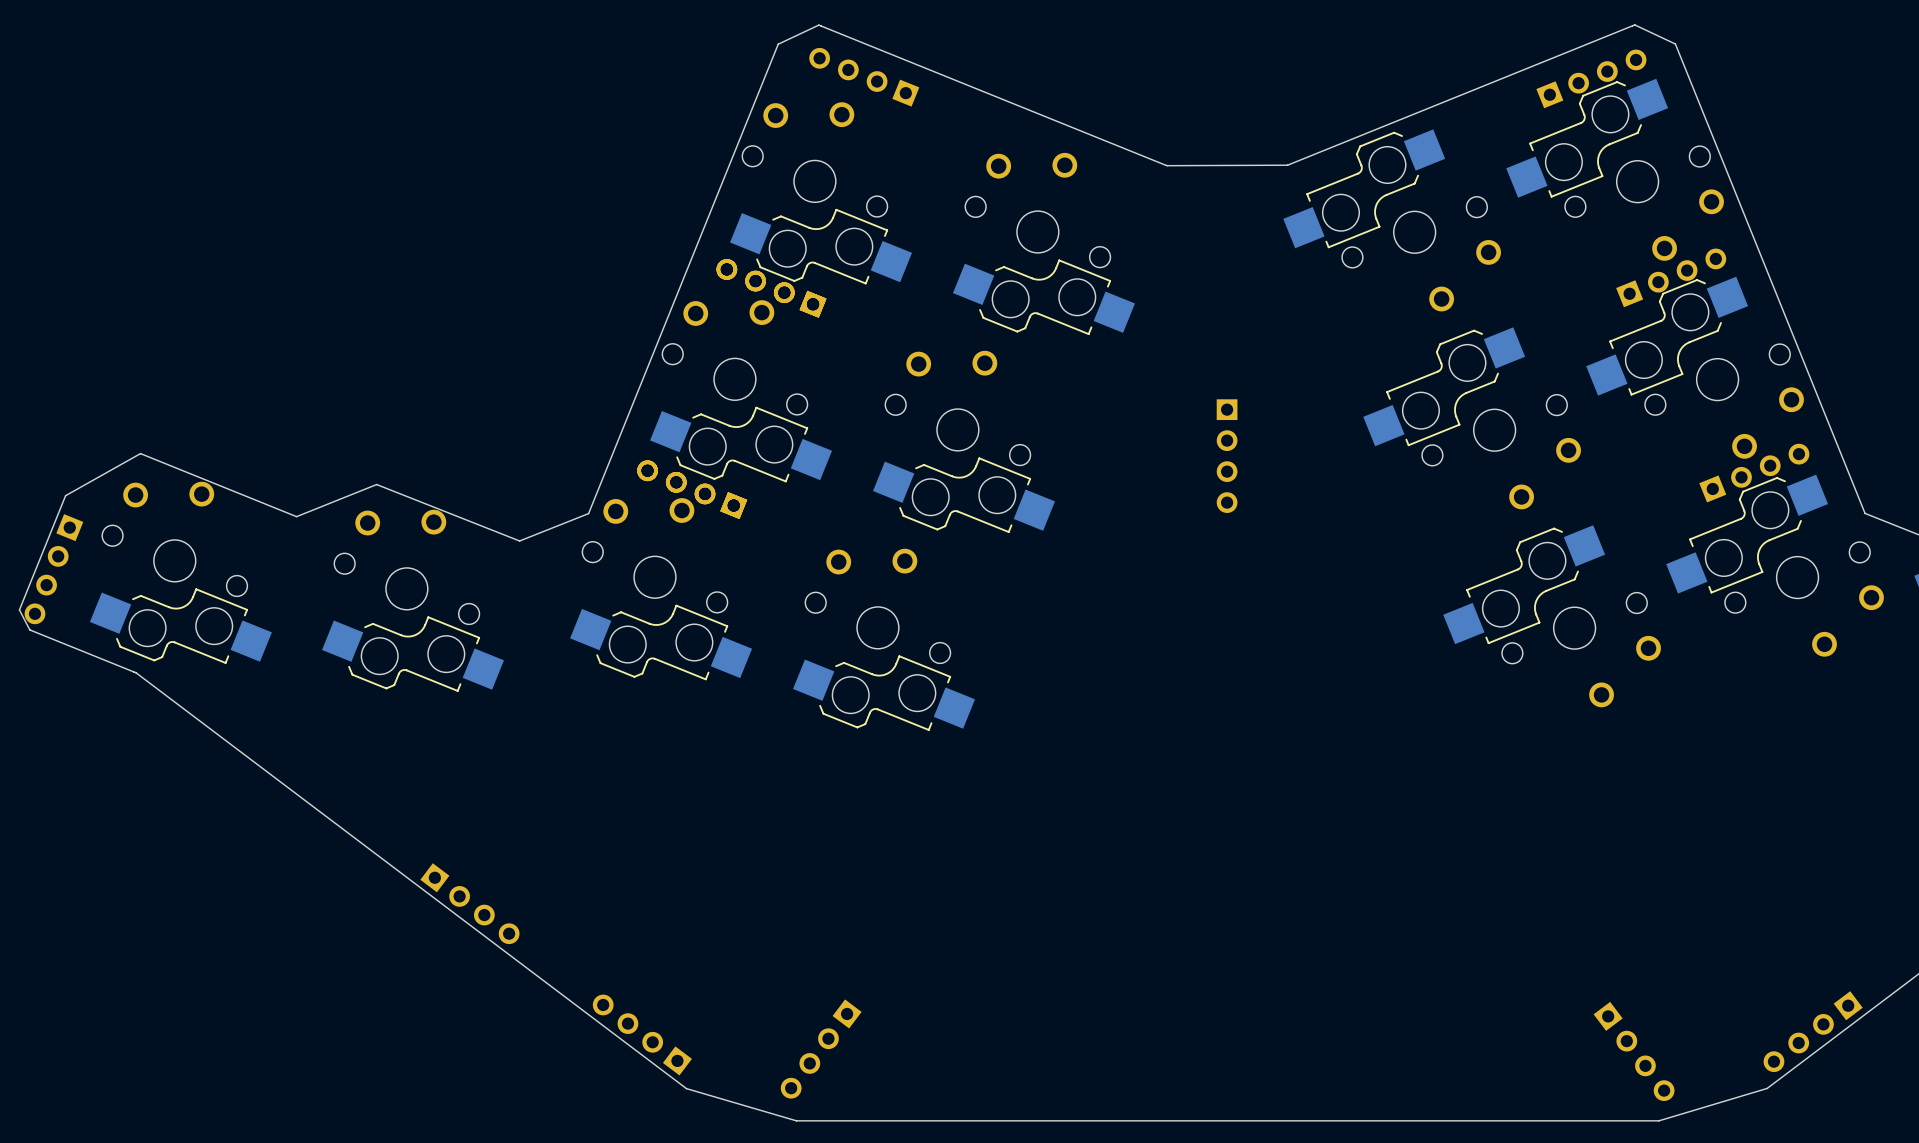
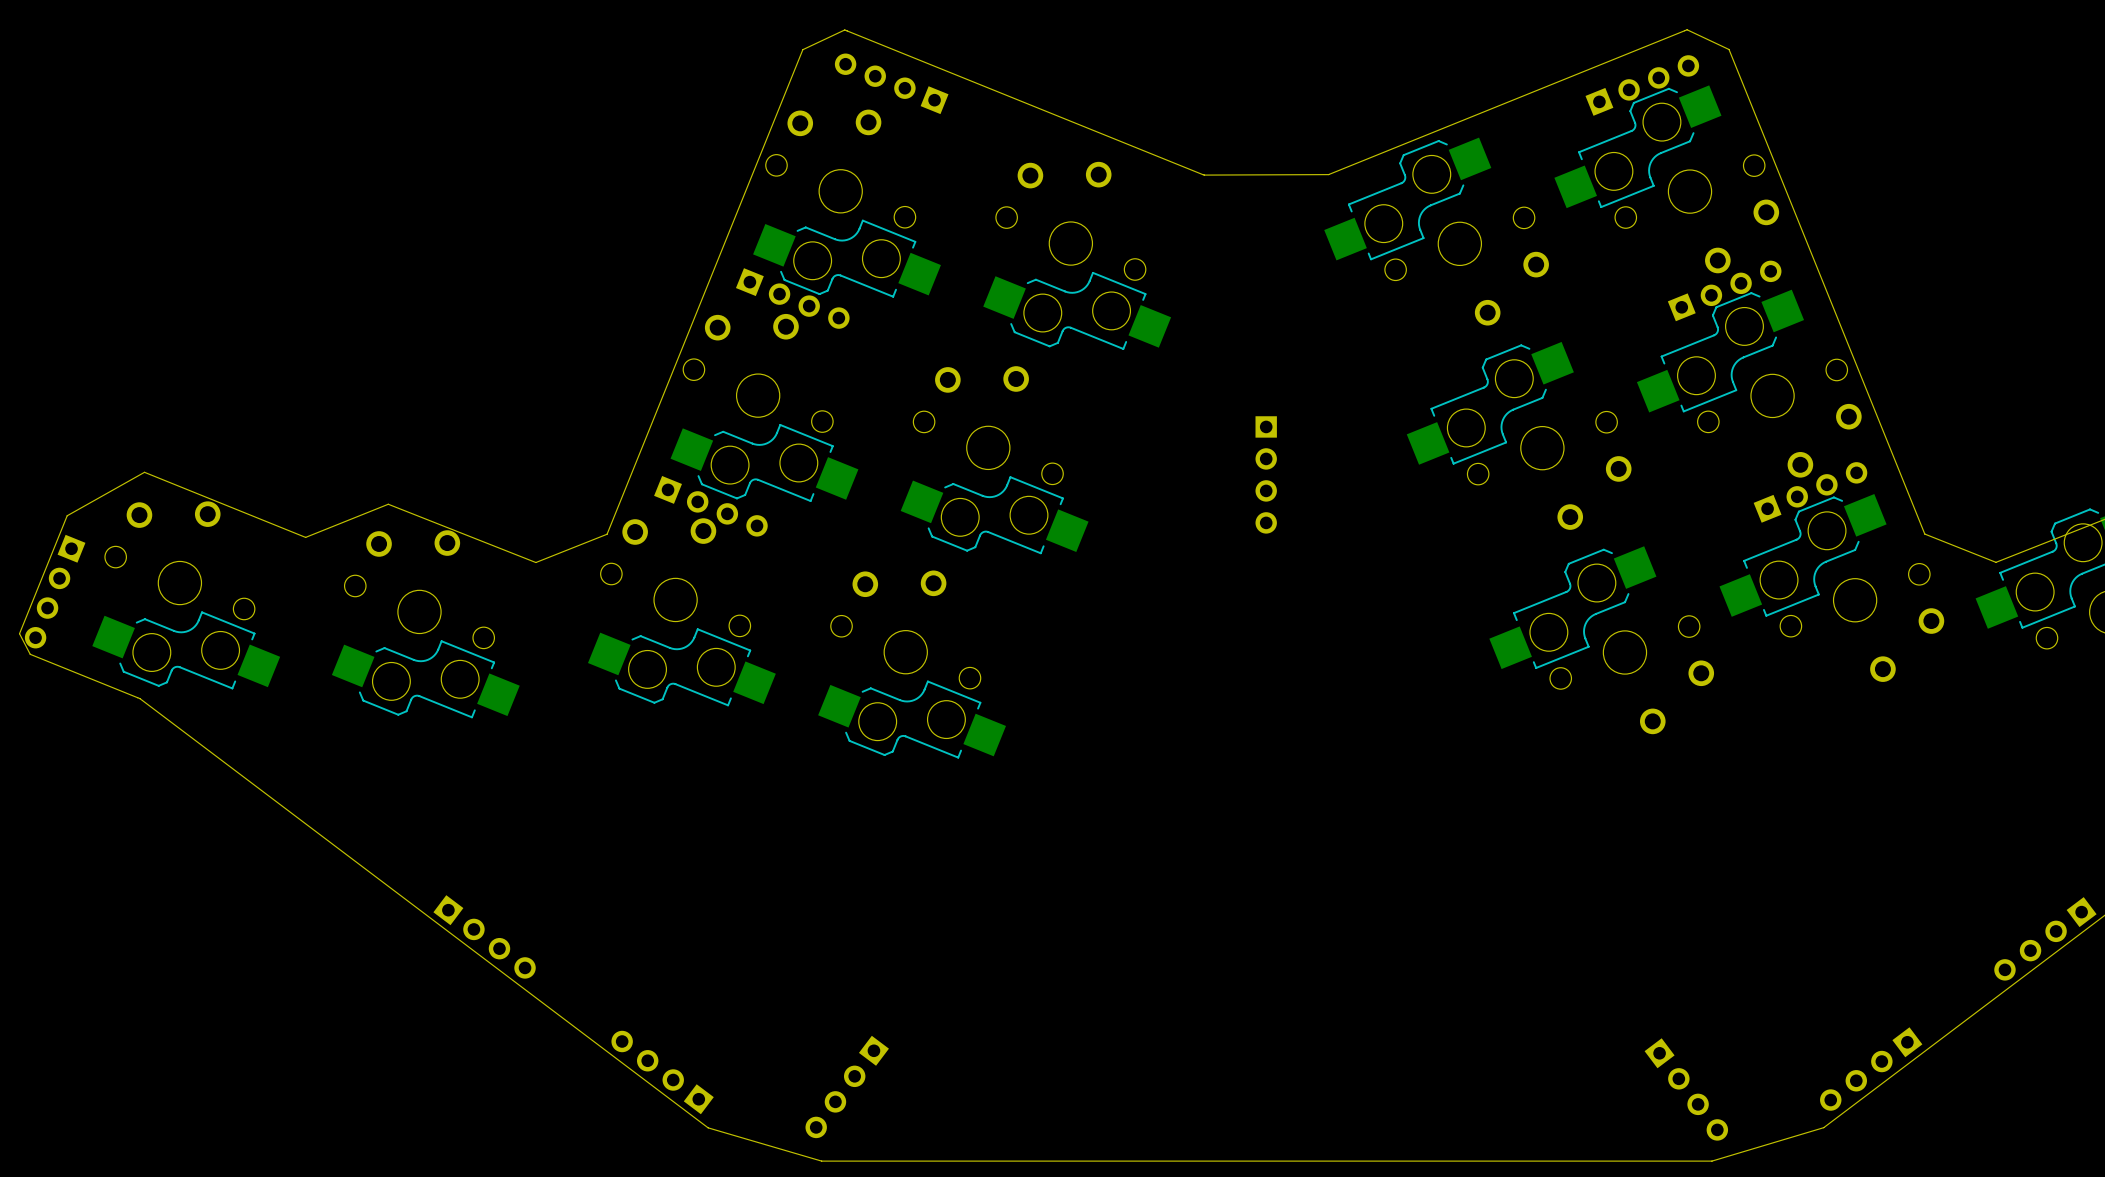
part: none -> (792, 298)
part: (771, 288) -> none
part: (771, 288) -> none
part: none -> (710, 506)
part: (692, 489) -> none
part: (692, 489) -> none

